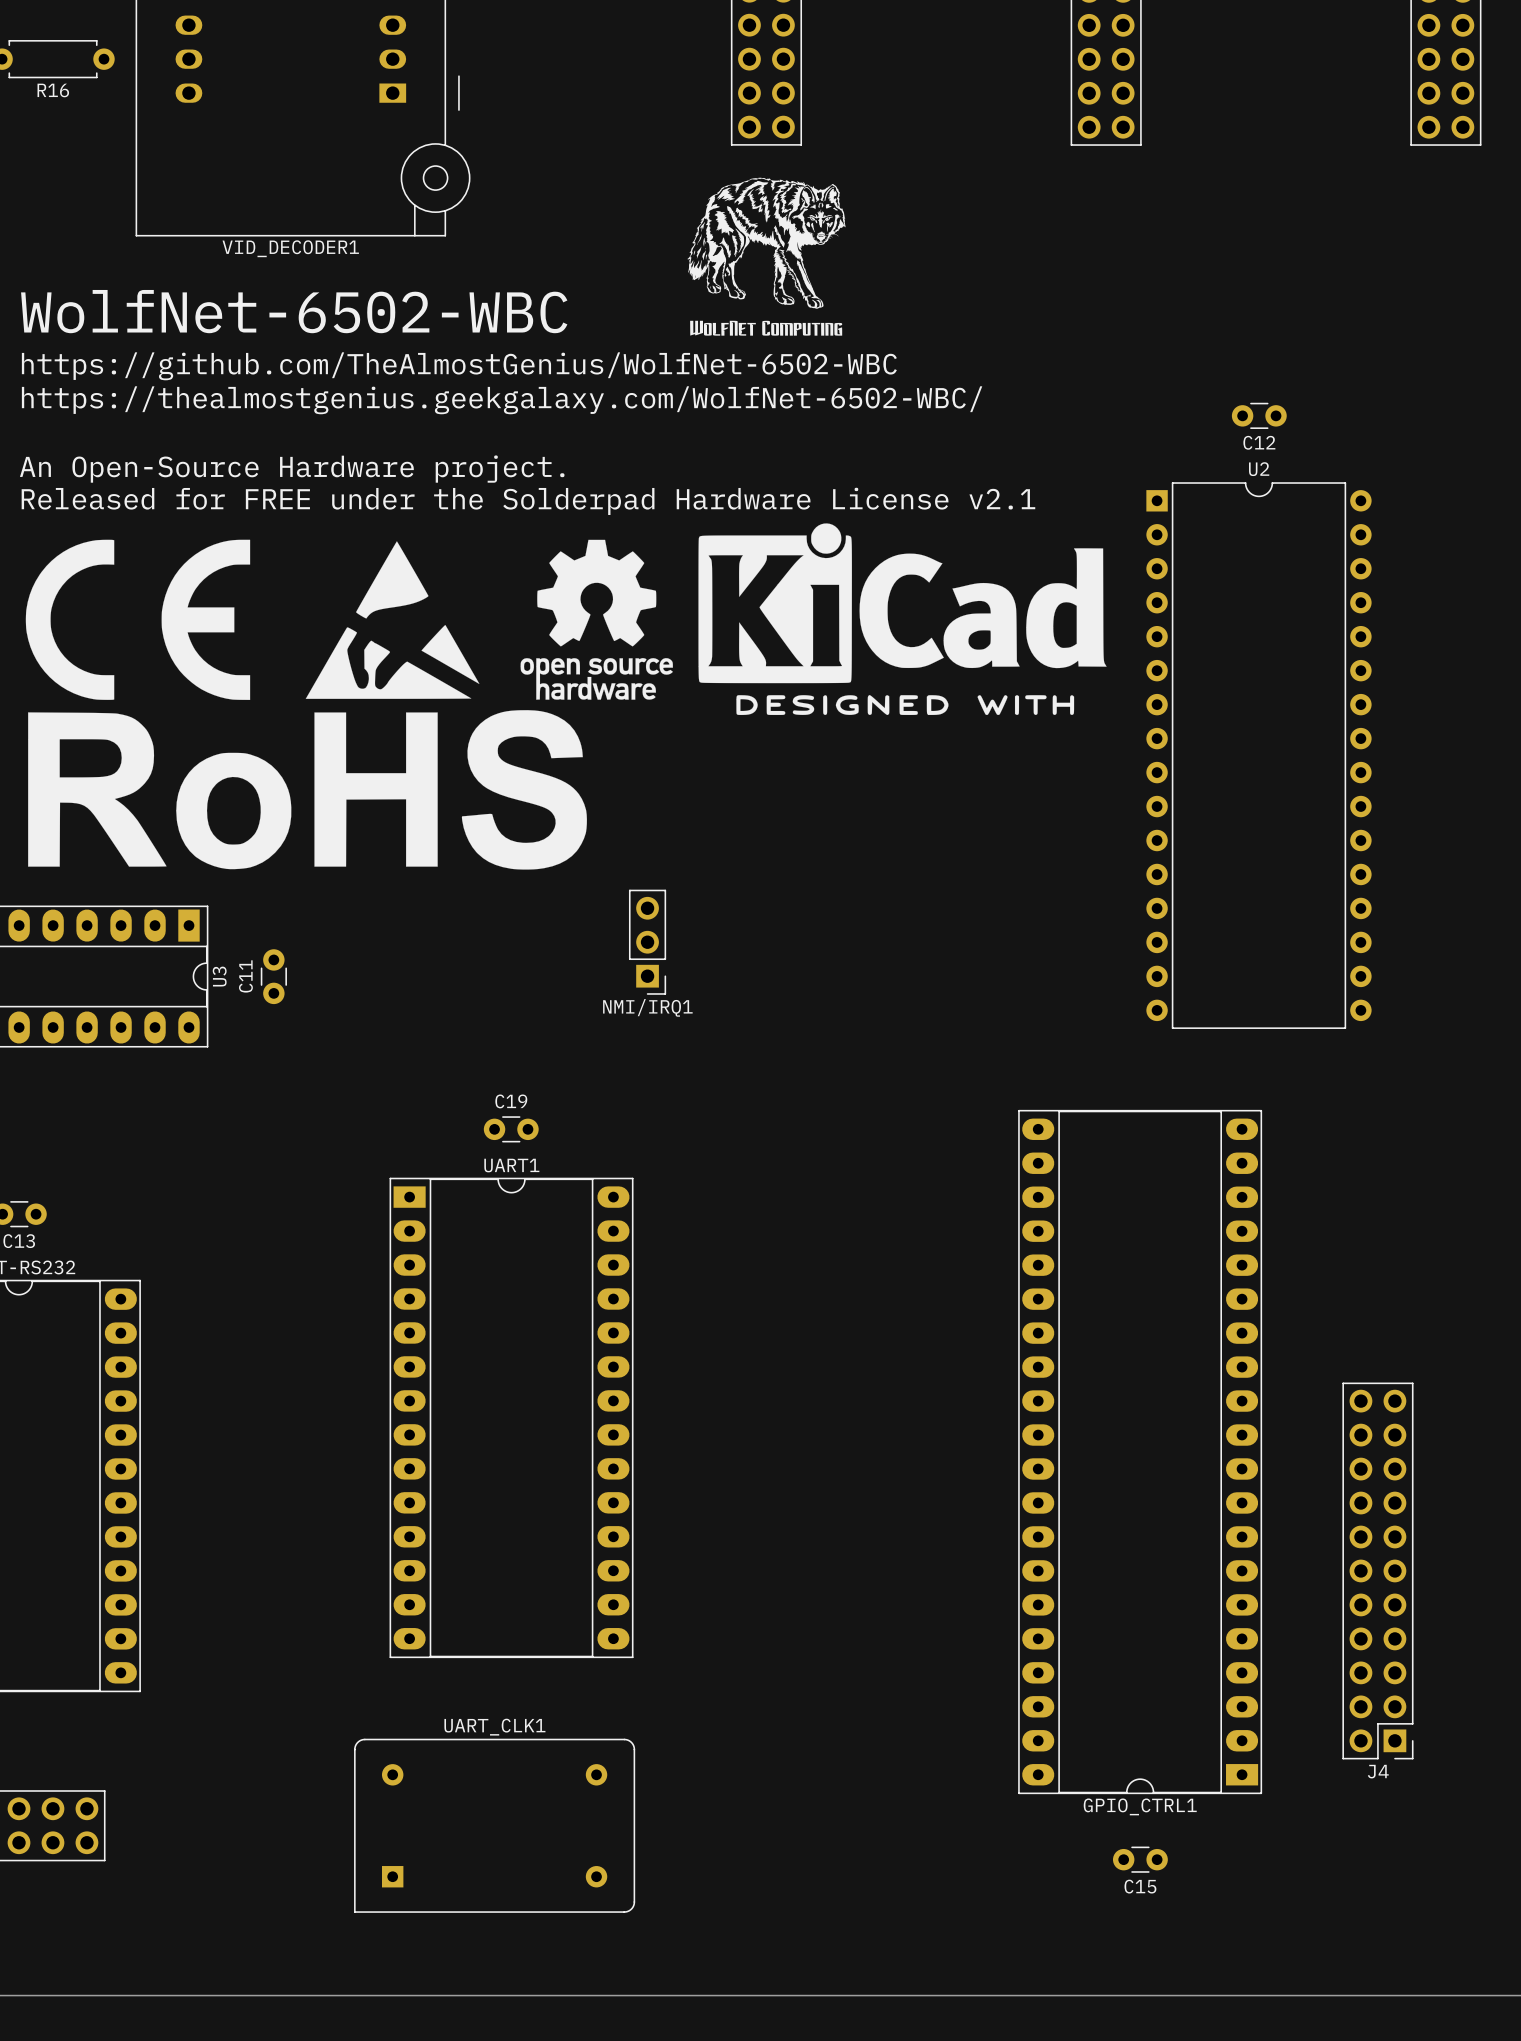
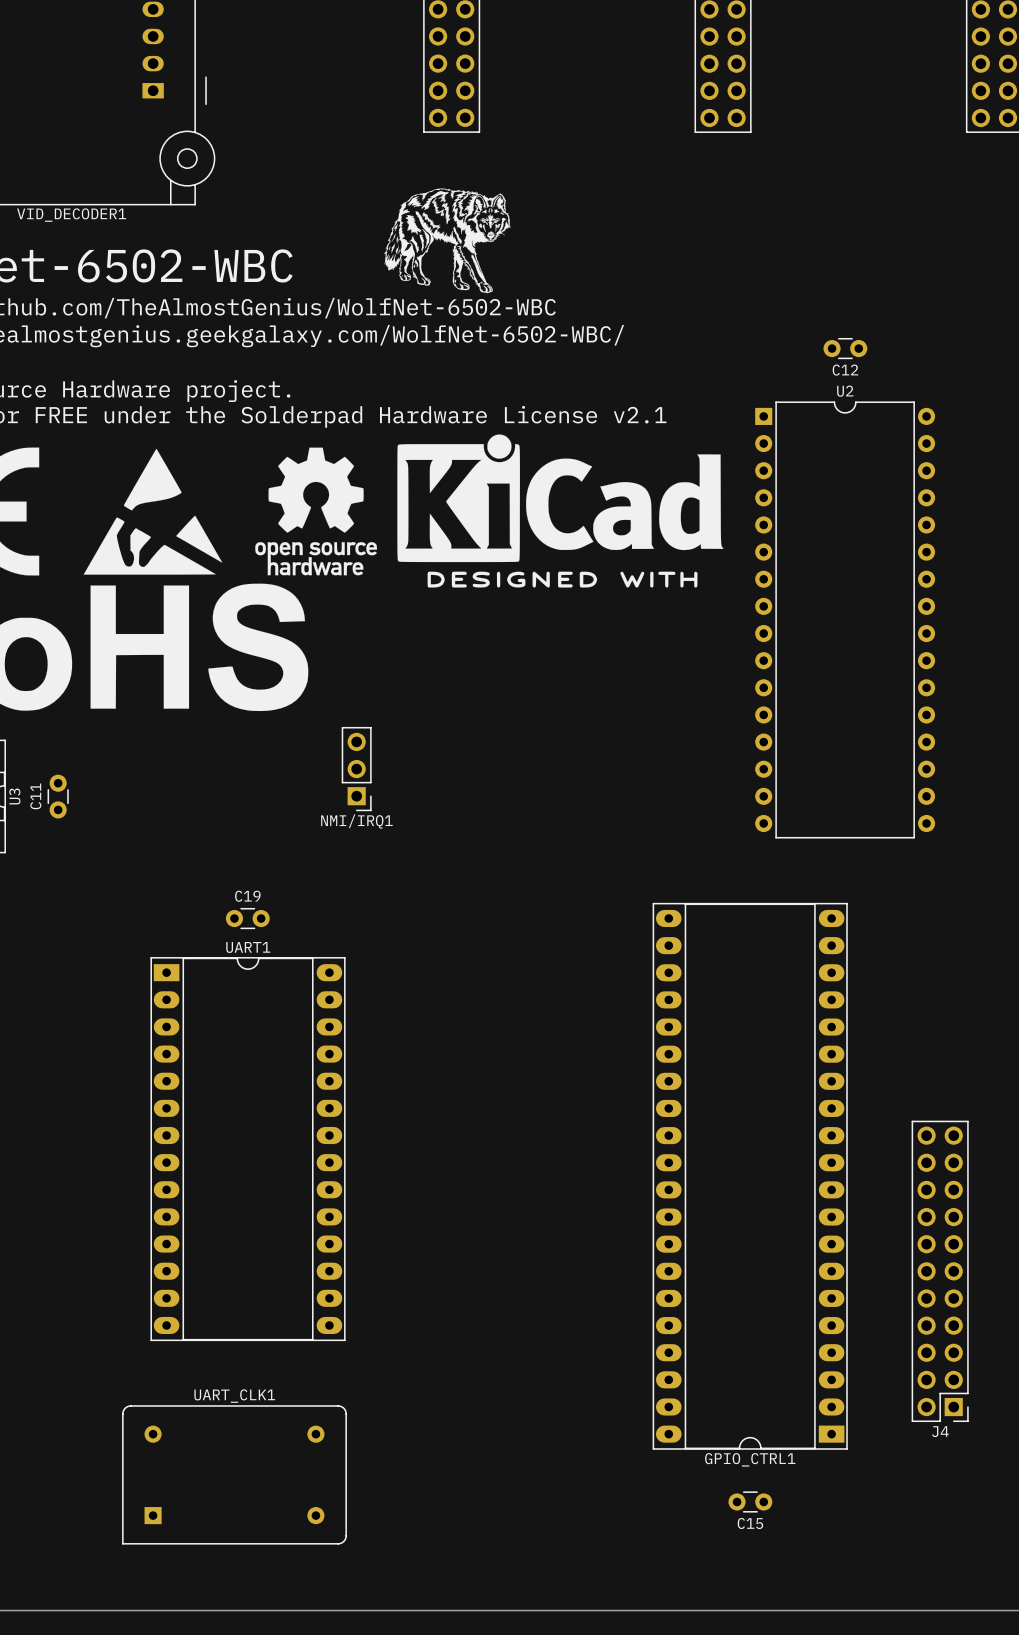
drawing: [687, 177, 846, 336] -> none
drawing: none -> [384, 188, 511, 294]

